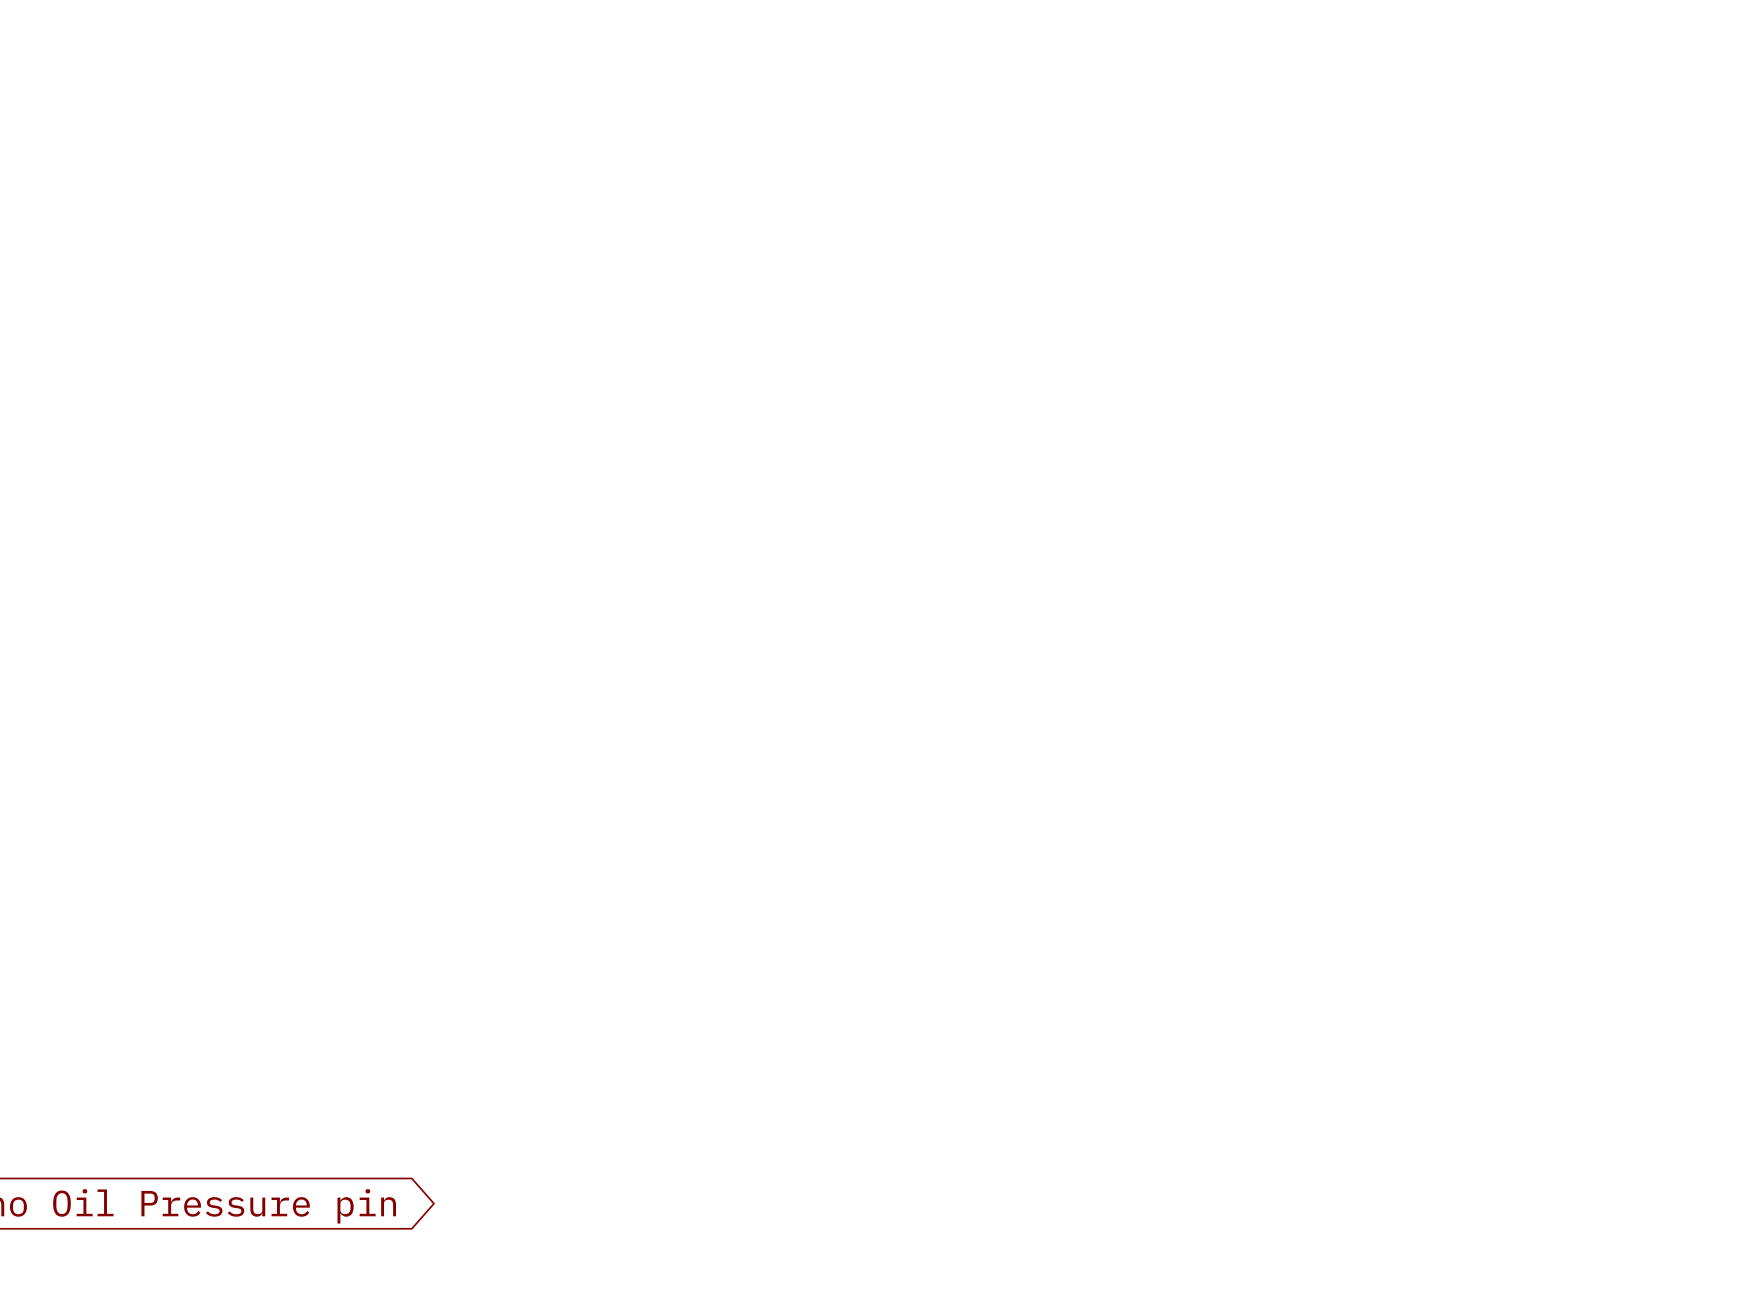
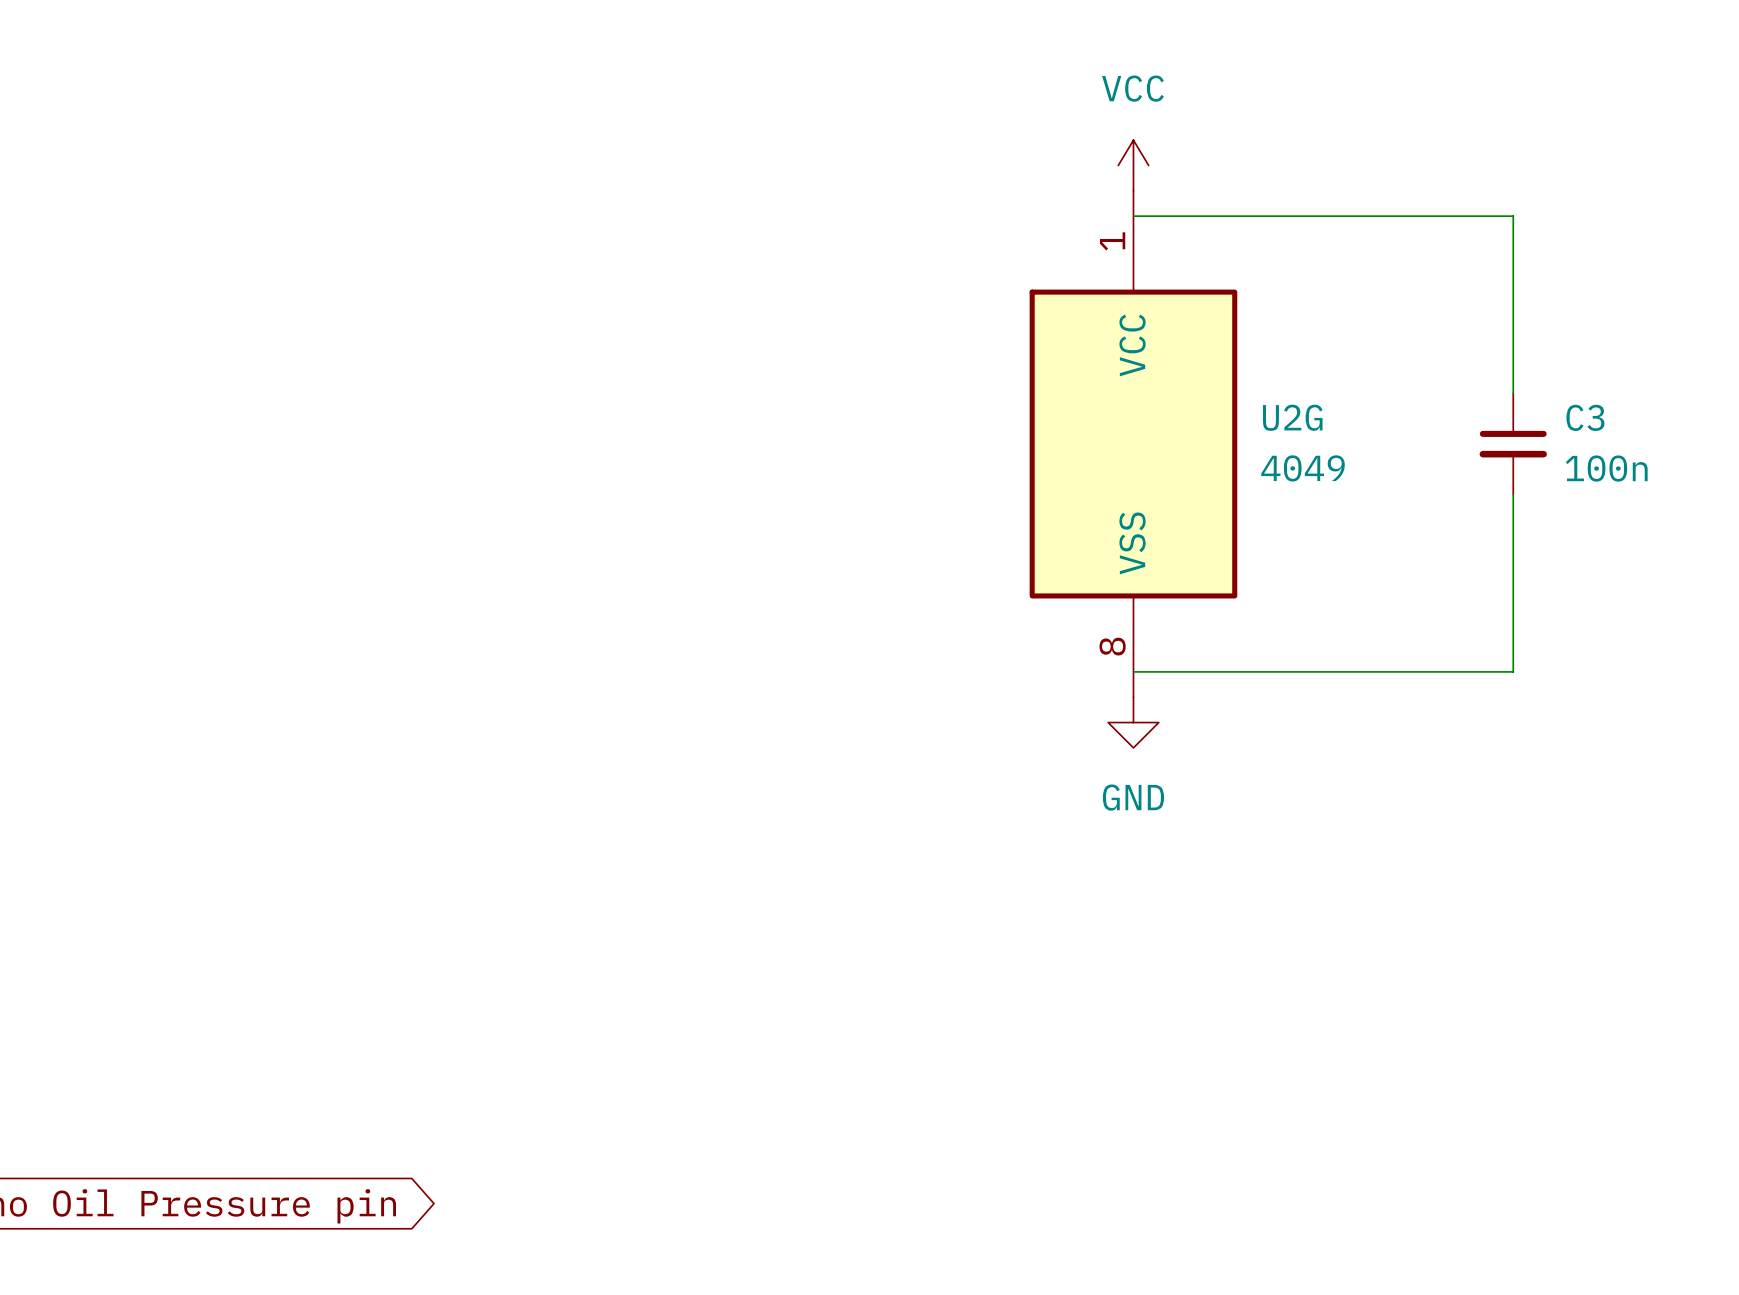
power symbol: none -> VCC (1133, 165)
wire: none -> (1133, 216) (1513, 216) (1513, 393)
U2G: none -> 4049 (1133, 444)
C3: none -> 100n (1513, 444)
wire: none -> (1513, 494) (1513, 671) (1133, 671)
power symbol: none -> GND (1133, 722)

